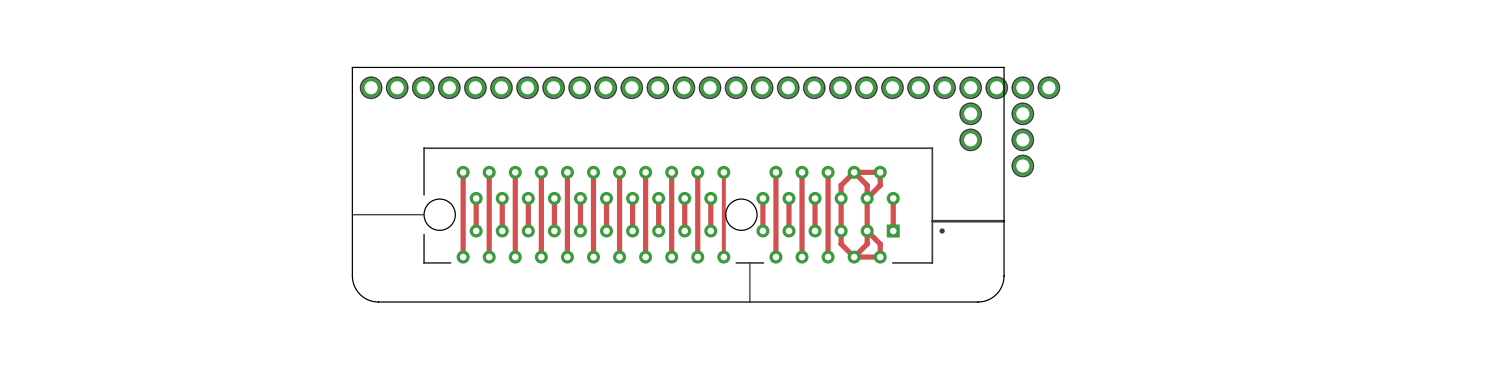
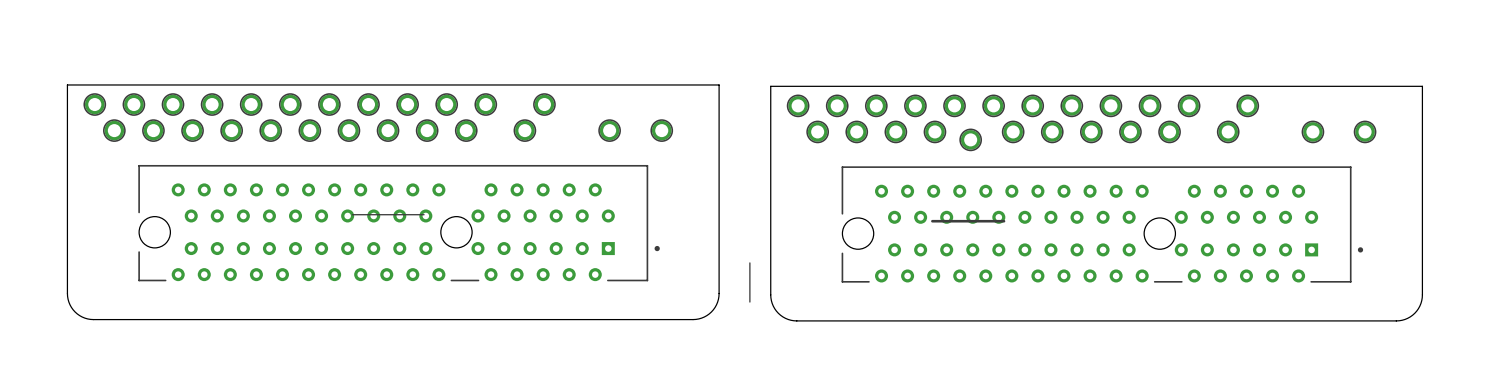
board edge: (352, 67) (1004, 67) (1002, 284) (994, 296) (977, 302) (369, 300) (358, 292) (352, 278) (352, 67) -> (67, 84) (719, 84) (717, 302) (706, 315) (693, 319) (84, 318) (73, 309) (67, 296) (67, 84)
board edge: none -> (770, 86) (770, 297) (776, 311) (788, 319) (1396, 320) (1410, 316) (1420, 303) (1422, 86) (770, 86)
part: (371, 87) -> none
part: (397, 87) -> none
part: (423, 87) -> none
part: (449, 87) -> none
part: (475, 87) -> none
part: (501, 87) -> none
part: (527, 87) -> none
part: (553, 87) -> none
part: (579, 87) -> none
part: (605, 87) -> none
part: (631, 87) -> none
part: (657, 87) -> none
part: (683, 87) -> none
part: (710, 87) -> none
part: (736, 87) -> none
part: (762, 87) -> none
part: (788, 87) -> none
part: (814, 87) -> none
part: (840, 87) -> none
part: (866, 87) -> none
part: (892, 87) -> none
part: (918, 87) -> none
part: (944, 87) -> none
part: (970, 87) -> none
part: (996, 87) -> none
part: (1022, 87) -> none
part: (1048, 87) -> none
part: none -> (94, 104)
part: none -> (133, 104)
part: none -> (172, 104)
part: none -> (212, 104)
part: none -> (251, 104)
part: none -> (290, 104)
part: none -> (329, 104)
part: none -> (368, 104)
part: none -> (407, 104)
part: none -> (446, 104)
part: none -> (485, 104)
part: none -> (544, 104)
part: none -> (798, 105)
part: none -> (837, 105)
part: none -> (876, 105)
part: none -> (915, 105)
part: none -> (954, 105)
part: none -> (993, 105)
part: none -> (1032, 105)
part: none -> (1071, 105)
part: none -> (1110, 105)
part: none -> (1150, 105)
part: none -> (1189, 105)
part: none -> (1247, 105)
part: (970, 113) -> none
part: (1022, 113) -> none
part: none -> (114, 130)
part: none -> (153, 130)
part: none -> (192, 130)
part: none -> (231, 130)
part: none -> (270, 130)
part: none -> (309, 130)
part: none -> (348, 130)
part: none -> (388, 130)
part: none -> (427, 130)
part: none -> (466, 130)
part: none -> (524, 130)
part: none -> (609, 130)
part: none -> (661, 130)
part: none -> (817, 131)
part: none -> (856, 131)
part: none -> (895, 131)
part: none -> (934, 131)
part: none -> (1013, 131)
part: none -> (1052, 131)
part: none -> (1091, 131)
part: none -> (1130, 131)
part: none -> (1169, 131)
part: none -> (1228, 131)
part: none -> (1312, 131)
part: none -> (1365, 131)
part: (1022, 139) -> none
part: (1022, 165) -> none
track: (463, 172) (463, 257) -> none
track: (489, 172) (489, 257) -> none
track: (515, 172) (515, 257) -> none
track: (541, 172) (541, 257) -> none
track: (567, 172) (567, 257) -> none
track: (593, 172) (593, 257) -> none
track: (619, 172) (619, 257) -> none
track: (645, 172) (645, 257) -> none
track: (671, 172) (671, 257) -> none
track: (697, 172) (697, 257) -> none
track: (723, 172) (723, 257) -> none
track: (775, 172) (775, 257) -> none
track: (802, 172) (802, 257) -> none
track: (828, 172) (828, 257) -> none
track: (854, 172) (880, 172) (880, 185) (867, 198) -> none
track: (854, 172) (867, 185) (867, 244) (854, 257) -> none
track: (854, 172) (841, 185) (841, 244) (854, 257) -> none
track: (476, 198) (476, 230) -> none
track: (502, 198) (502, 230) -> none
track: (528, 198) (528, 230) -> none
track: (554, 198) (554, 230) -> none
track: (580, 198) (580, 230) -> none
track: (606, 198) (606, 230) -> none
track: (632, 198) (632, 230) -> none
track: (658, 198) (658, 230) -> none
track: (684, 198) (684, 230) -> none
track: (710, 198) (710, 230) -> none
track: (762, 198) (762, 230) -> none
track: (788, 198) (788, 230) -> none
track: (815, 198) (815, 230) -> none
track: (893, 198) (893, 230) -> none
part: (683, 205) -> none
part: none -> (399, 223)
part: none -> (1102, 224)
track: (867, 230) (880, 244) (880, 257) (854, 257) -> none

